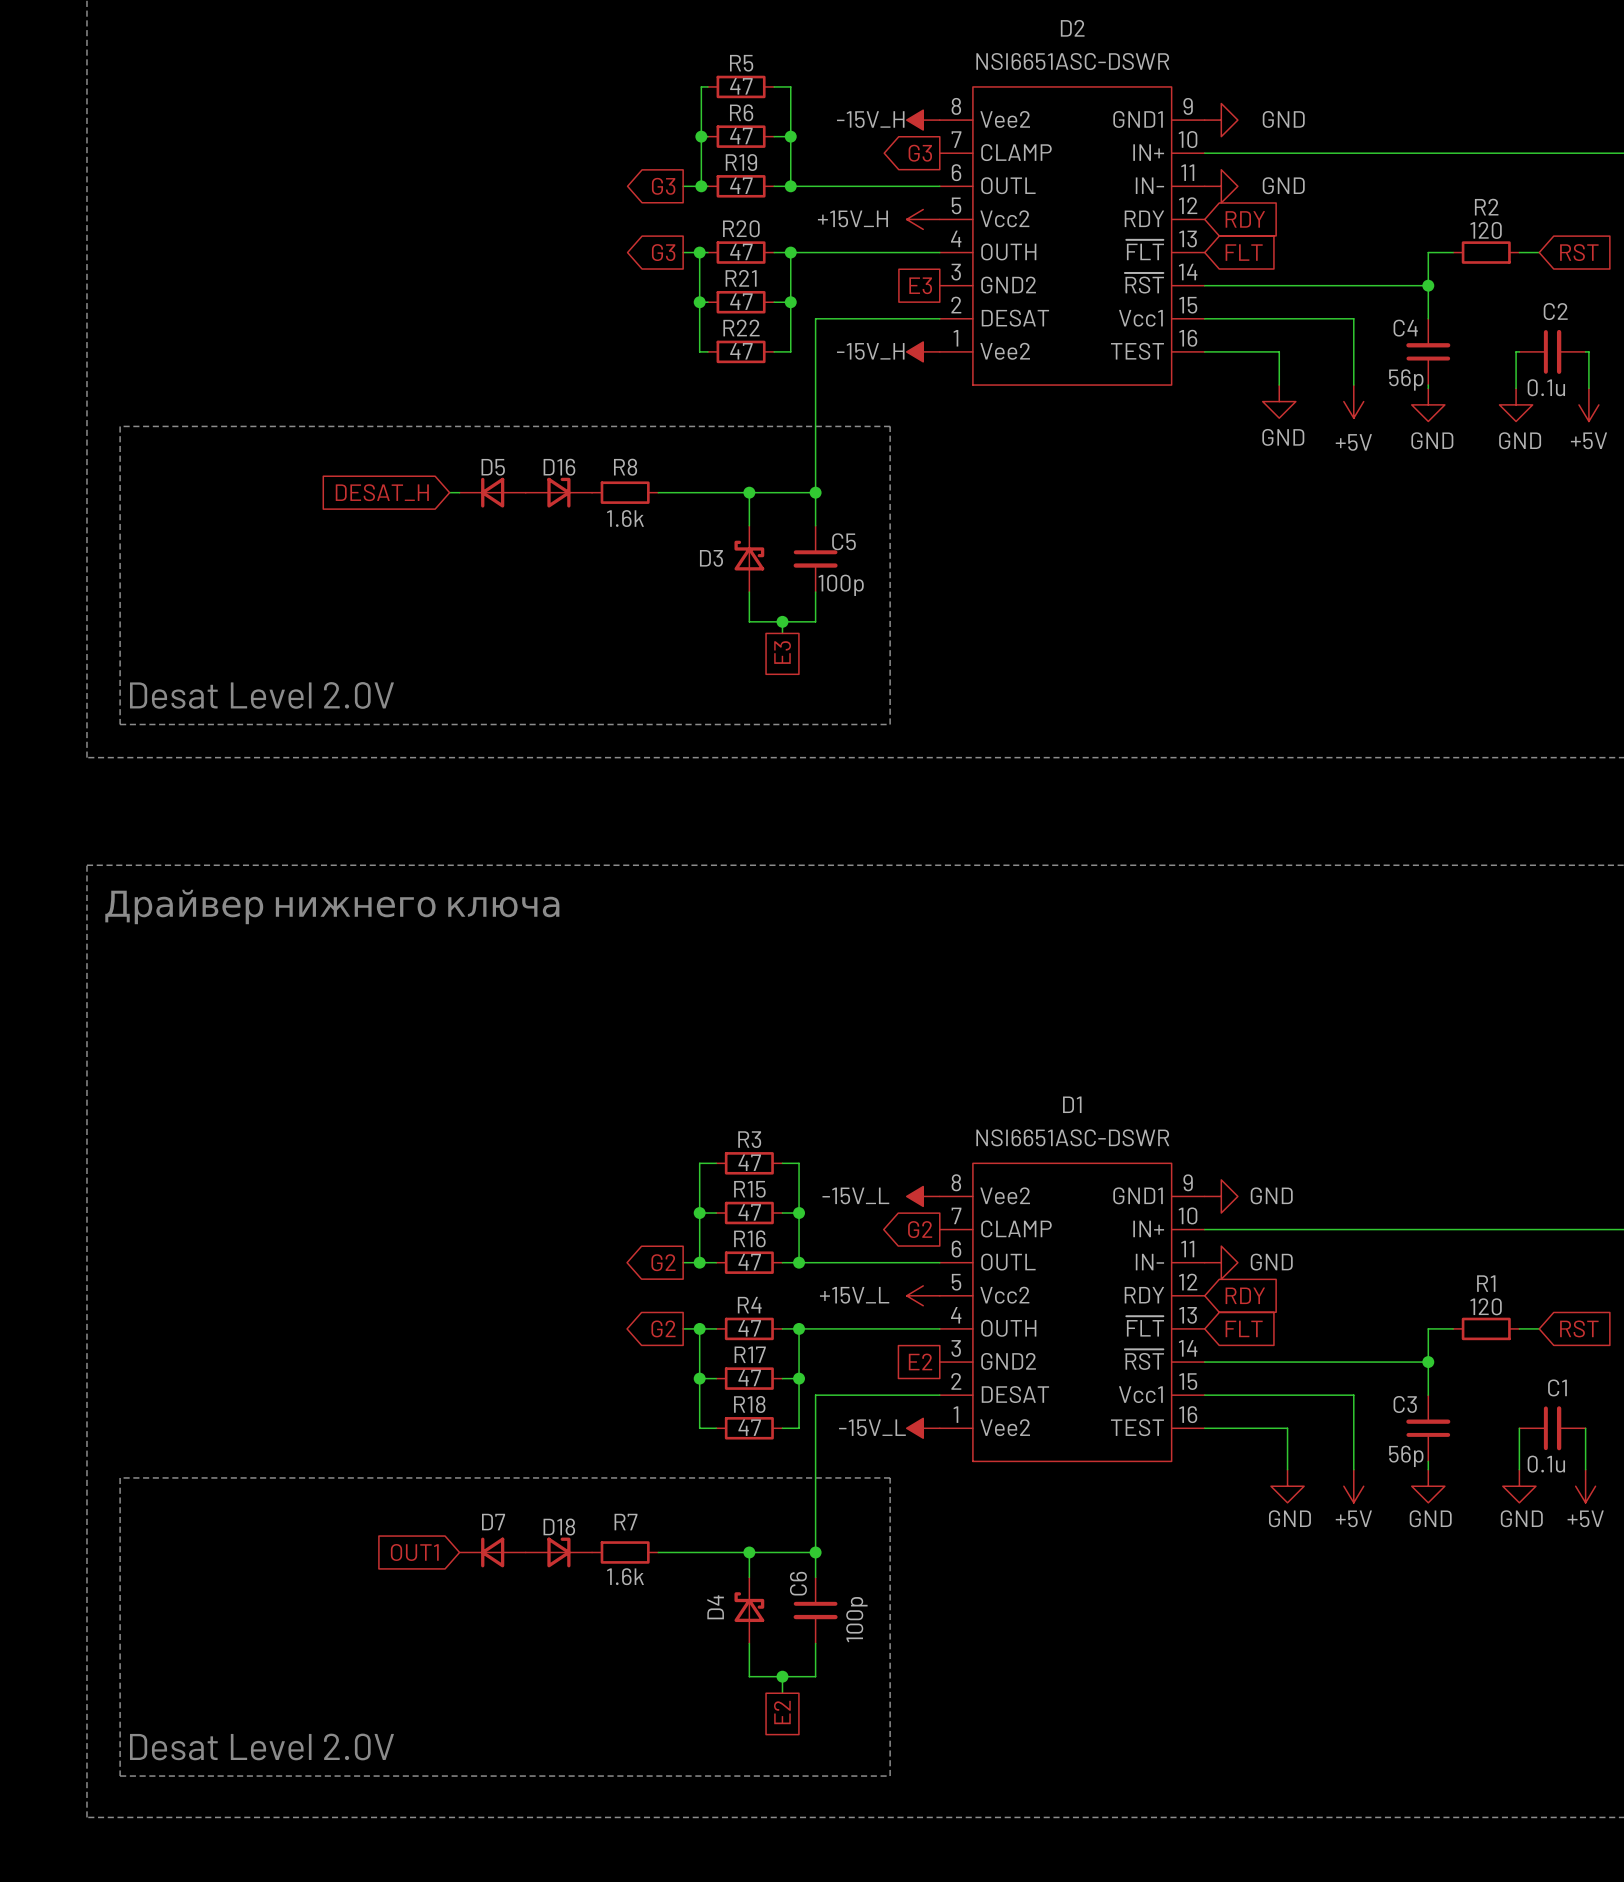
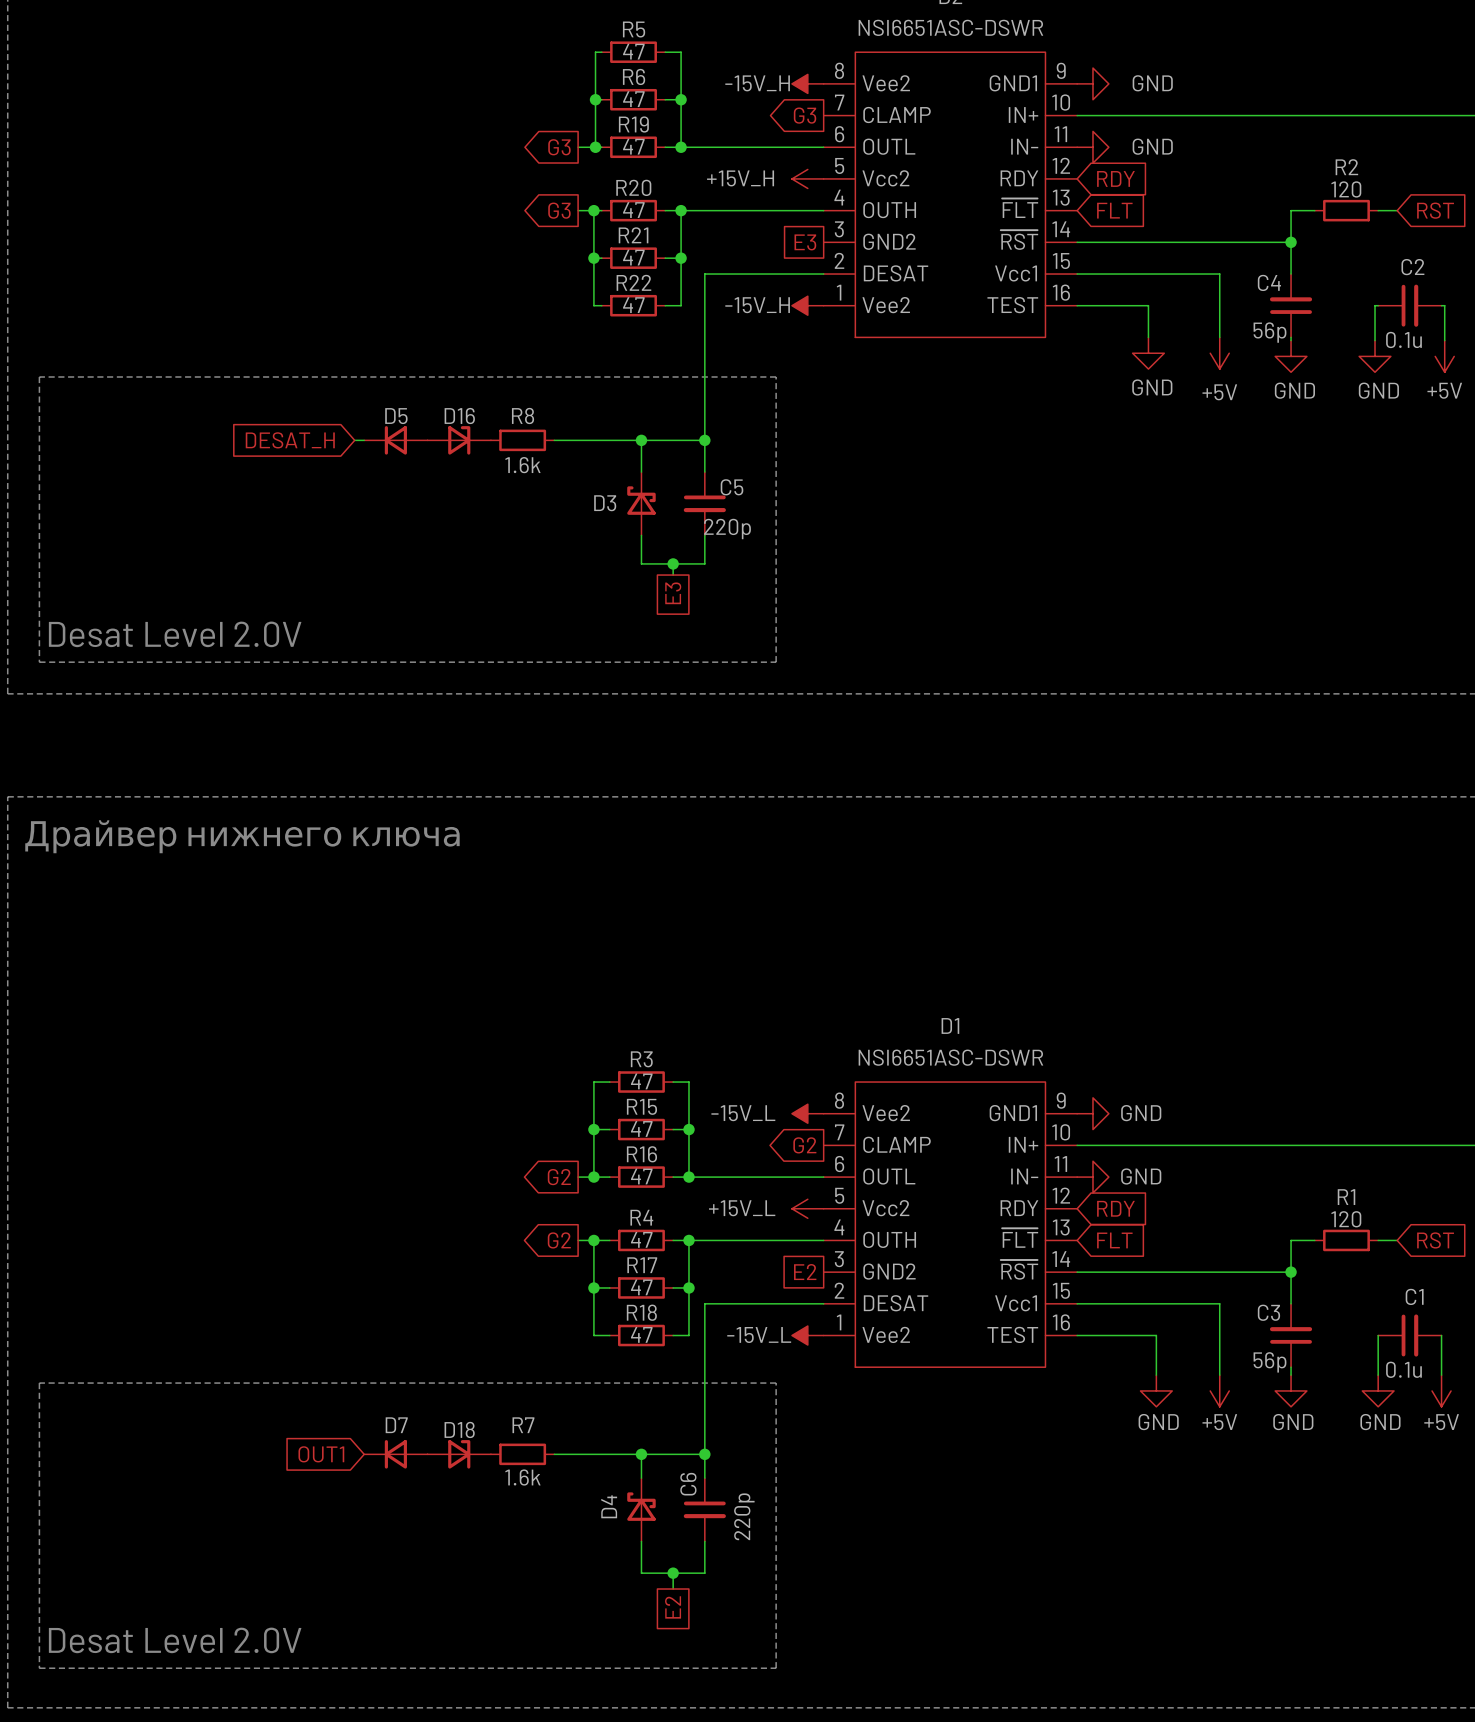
C5 value: 100p (841, 585) -> 220p (727, 529)
C6 value: 100p (856, 1619) -> 220p (744, 1516)

